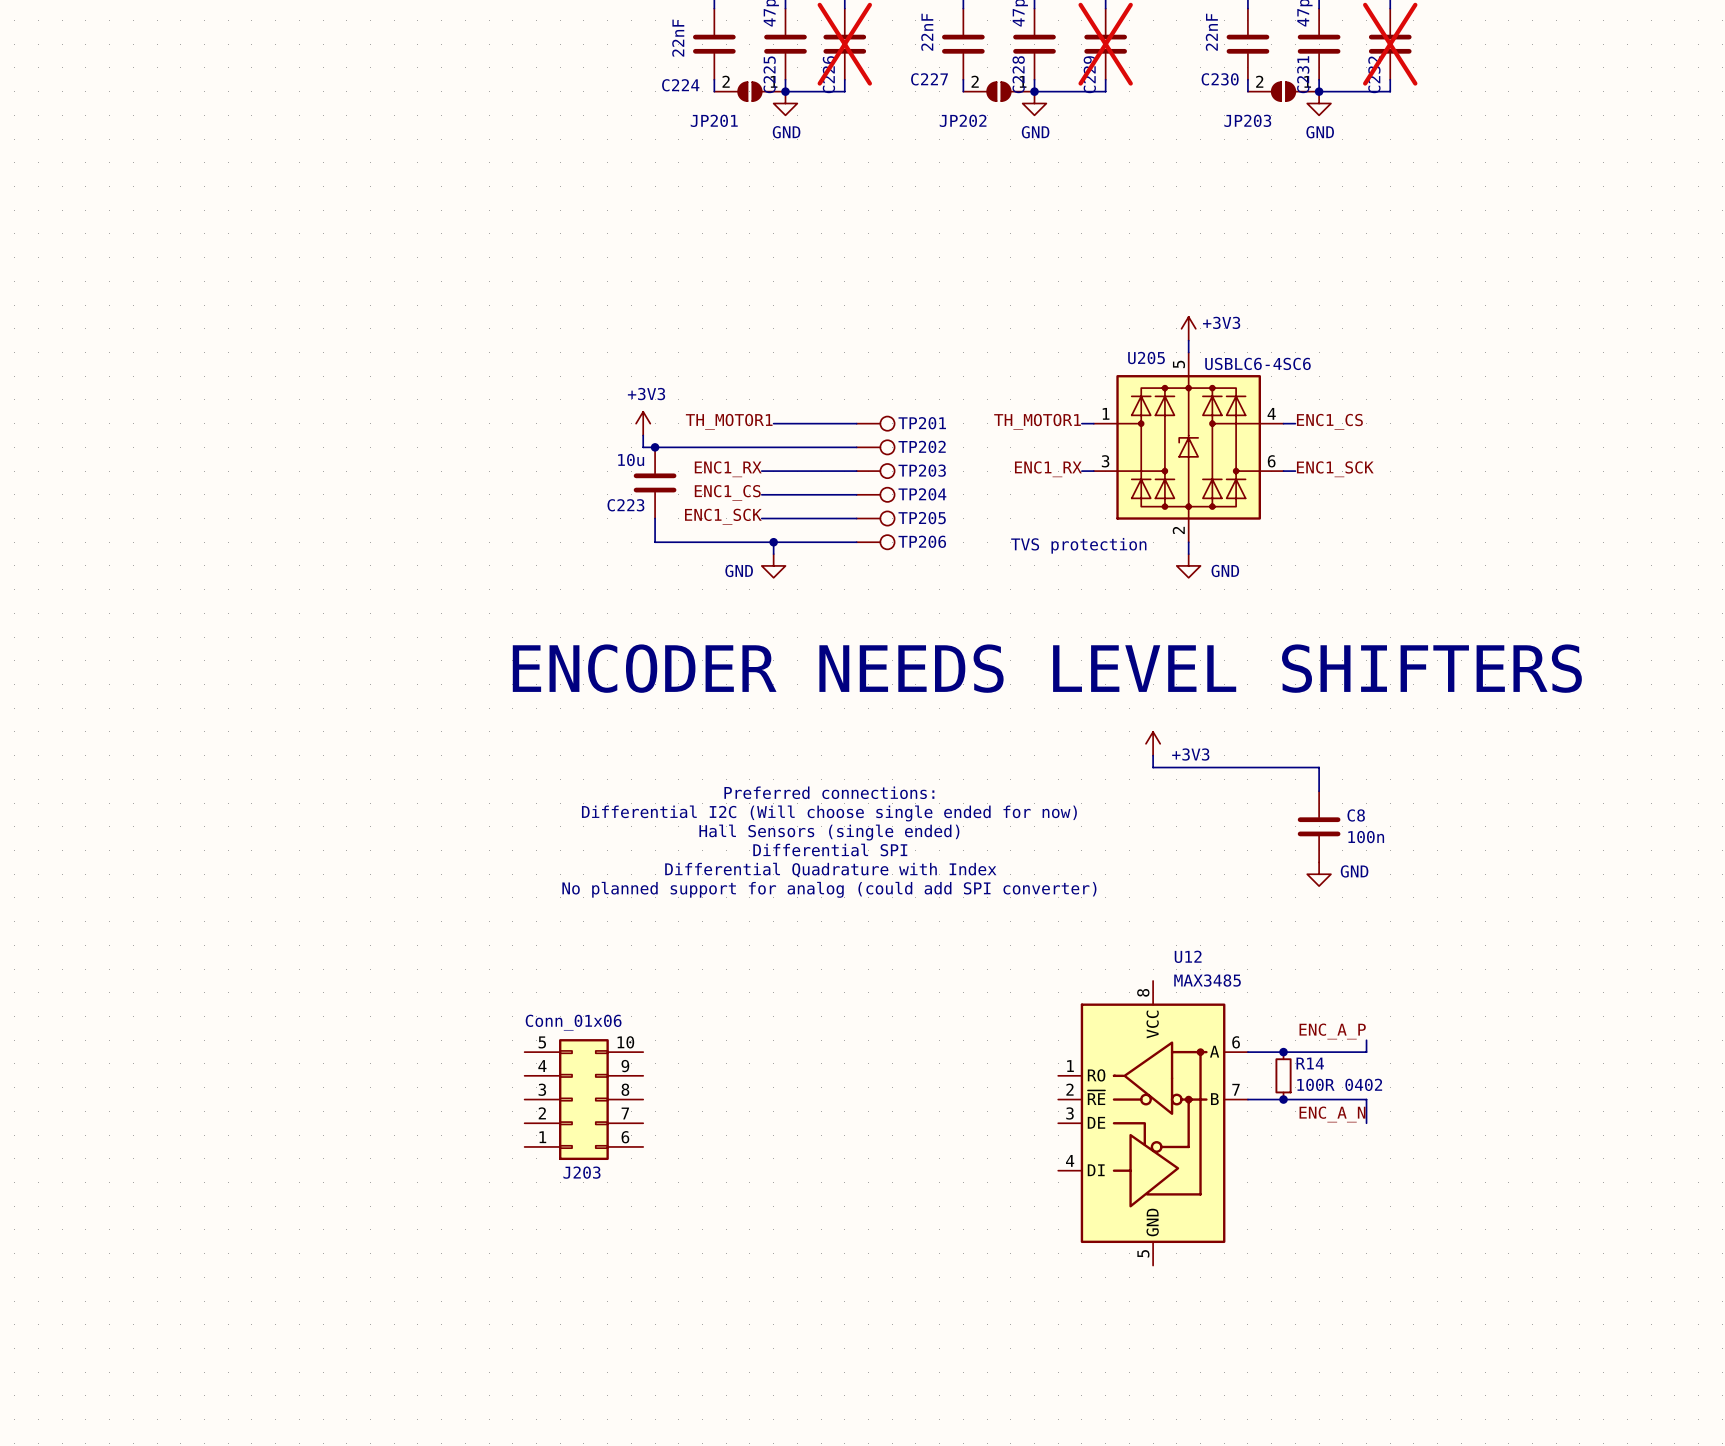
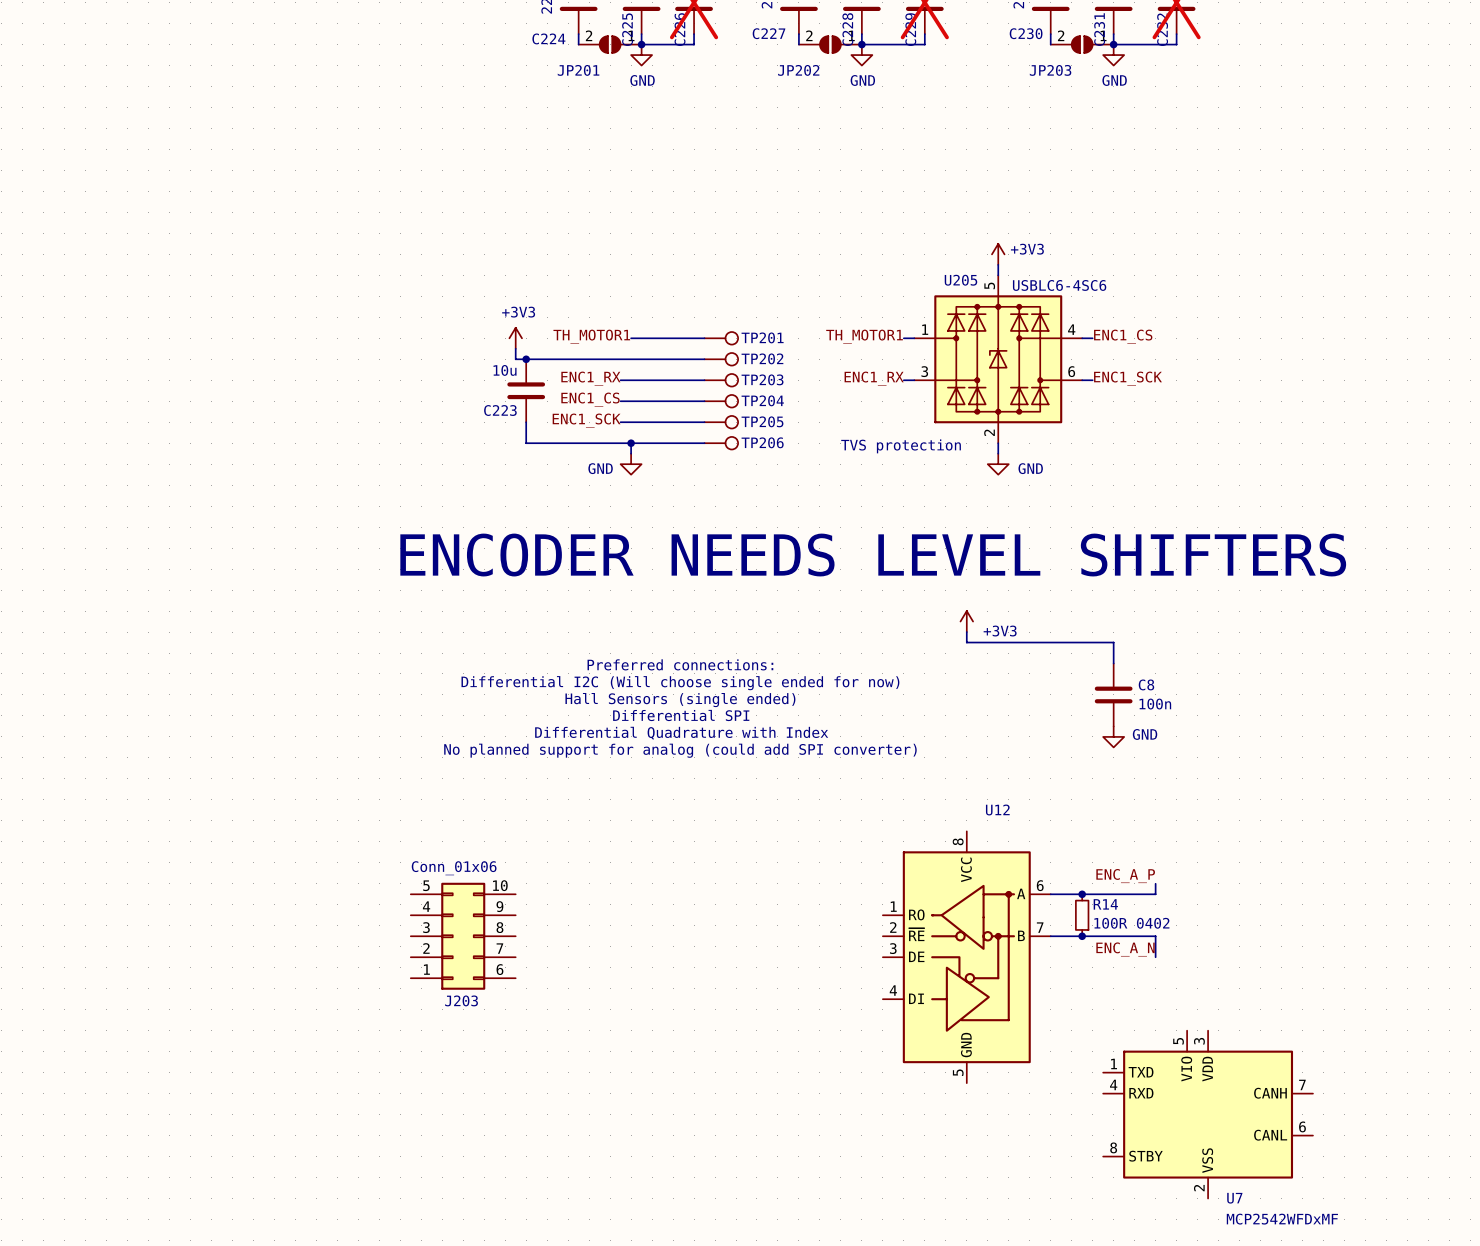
U12 value: MAX3485 (1207, 980) -> none
U7: none -> MCP2542WFDxMF (1208, 1114)

